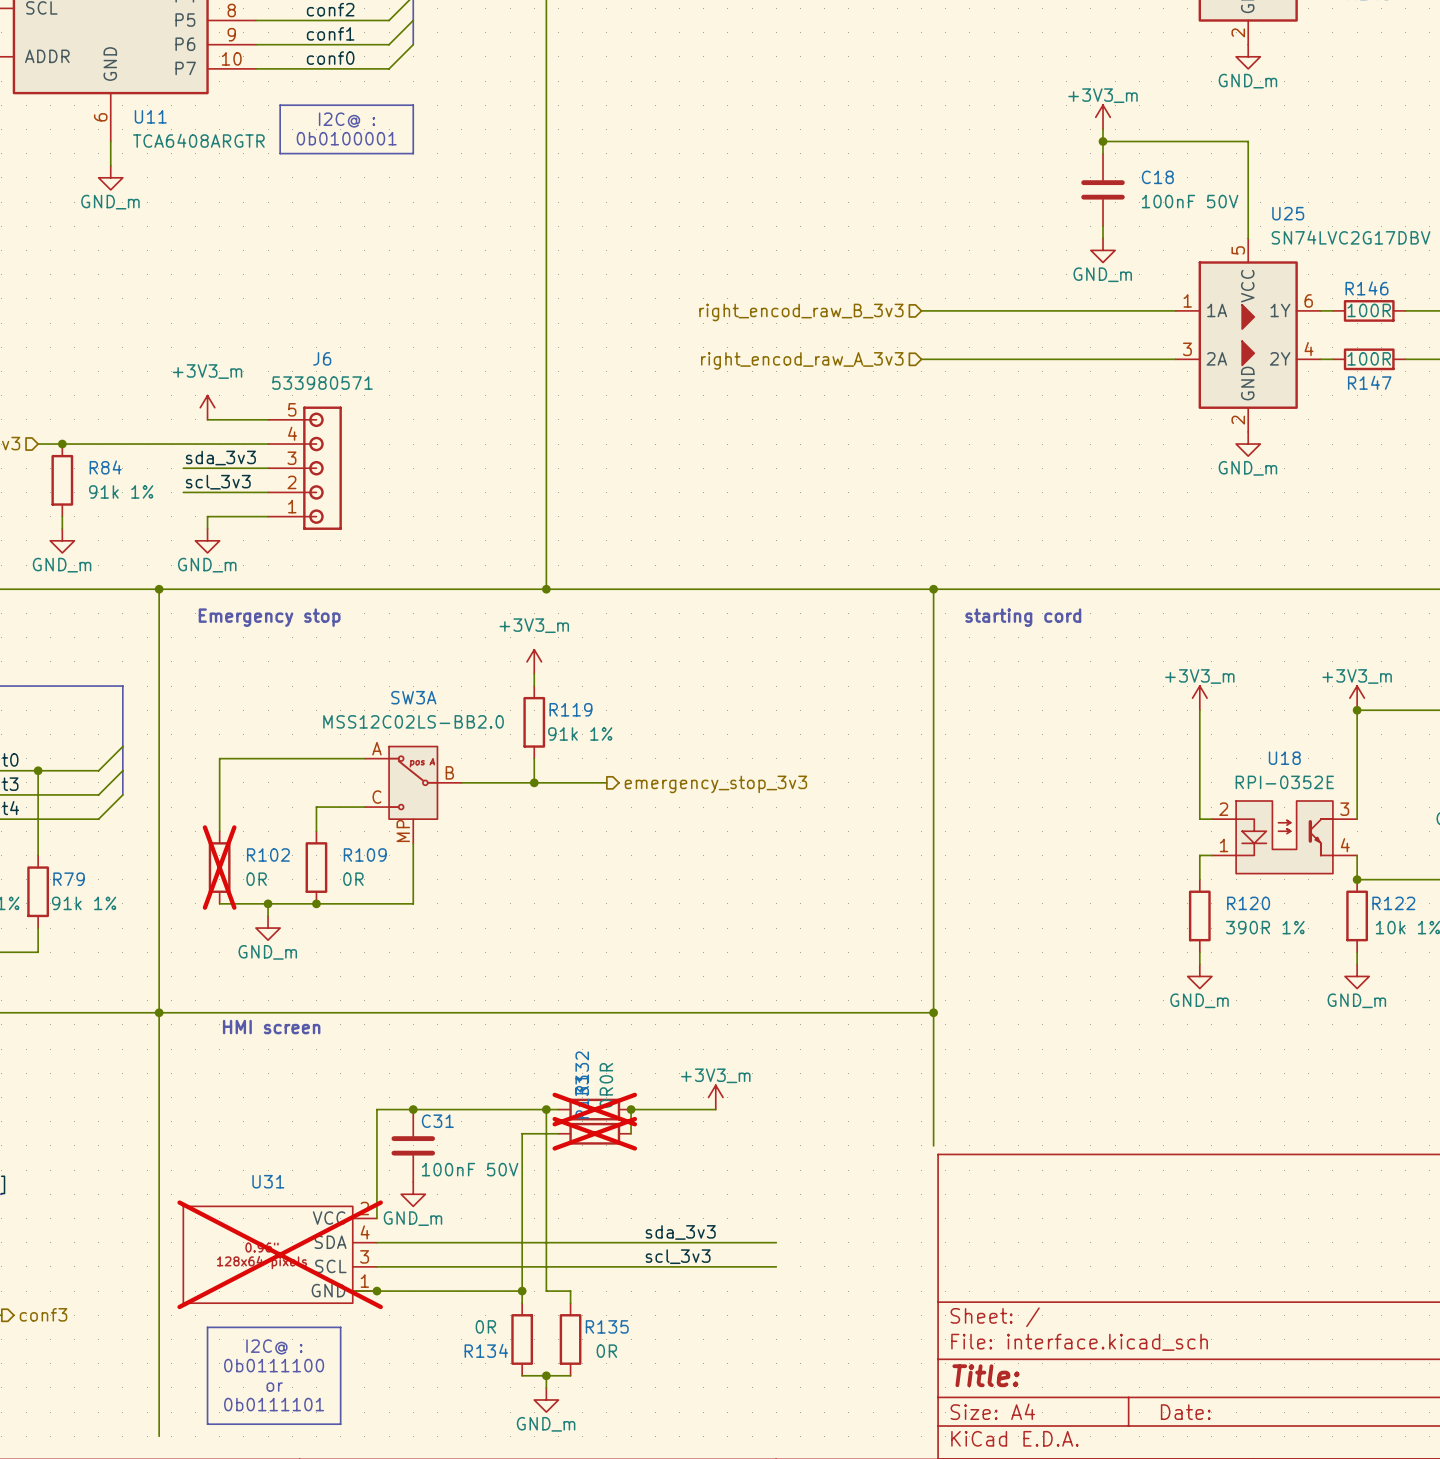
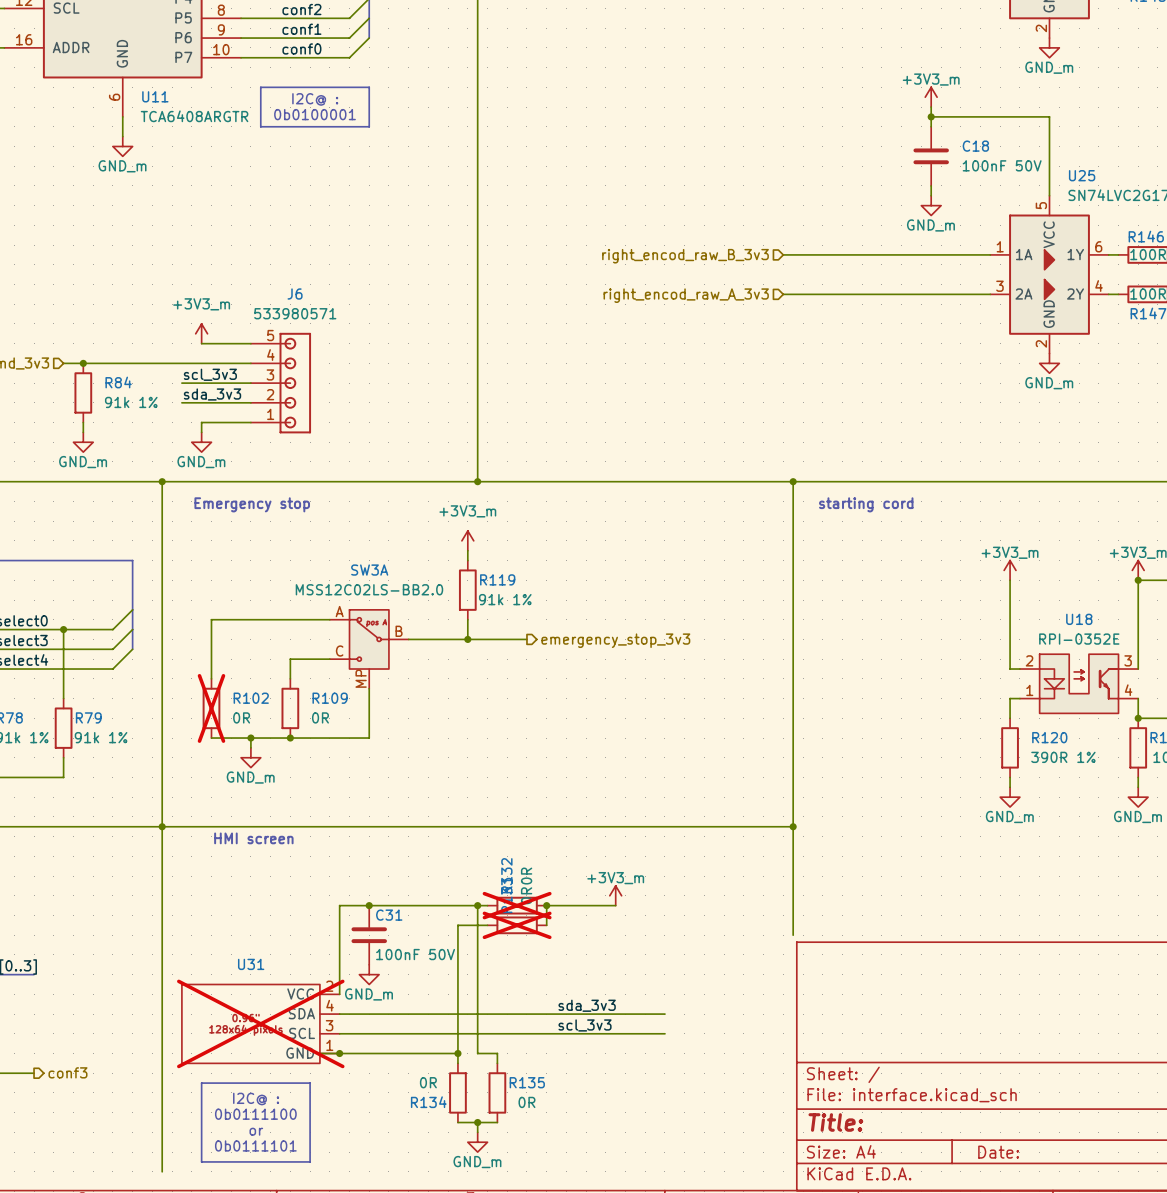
label: sda_3v3 (220, 458) -> scl_3v3 (210, 374)
label: scl_3v3 (218, 482) -> sda_3v3 (212, 394)

